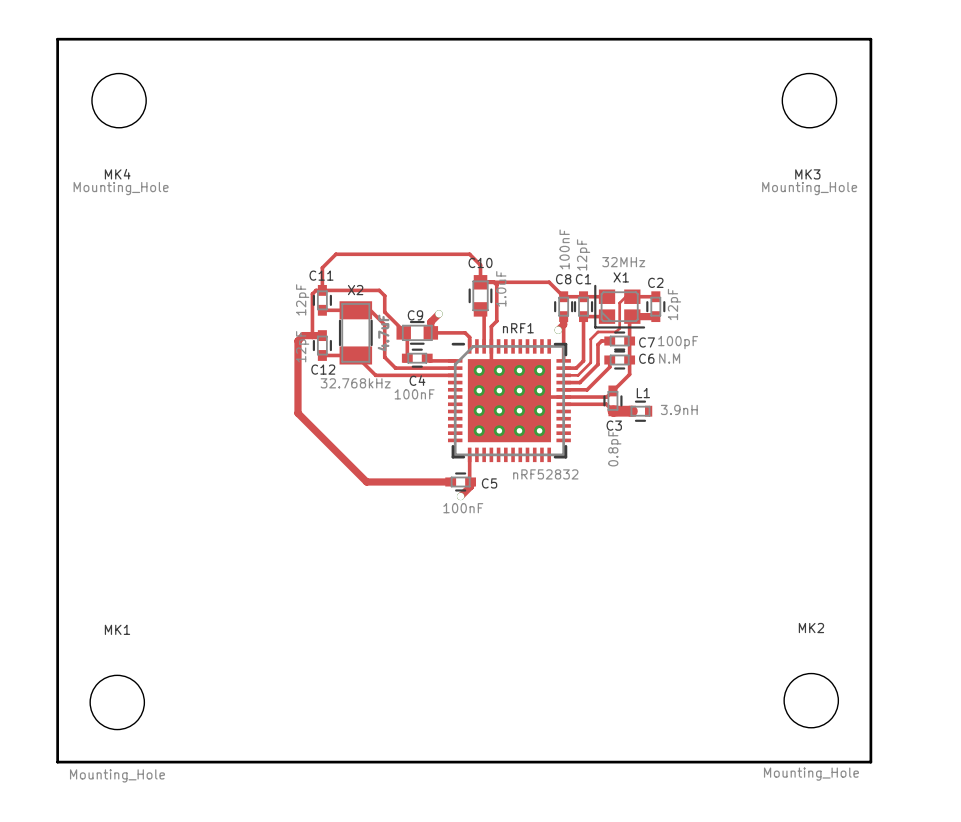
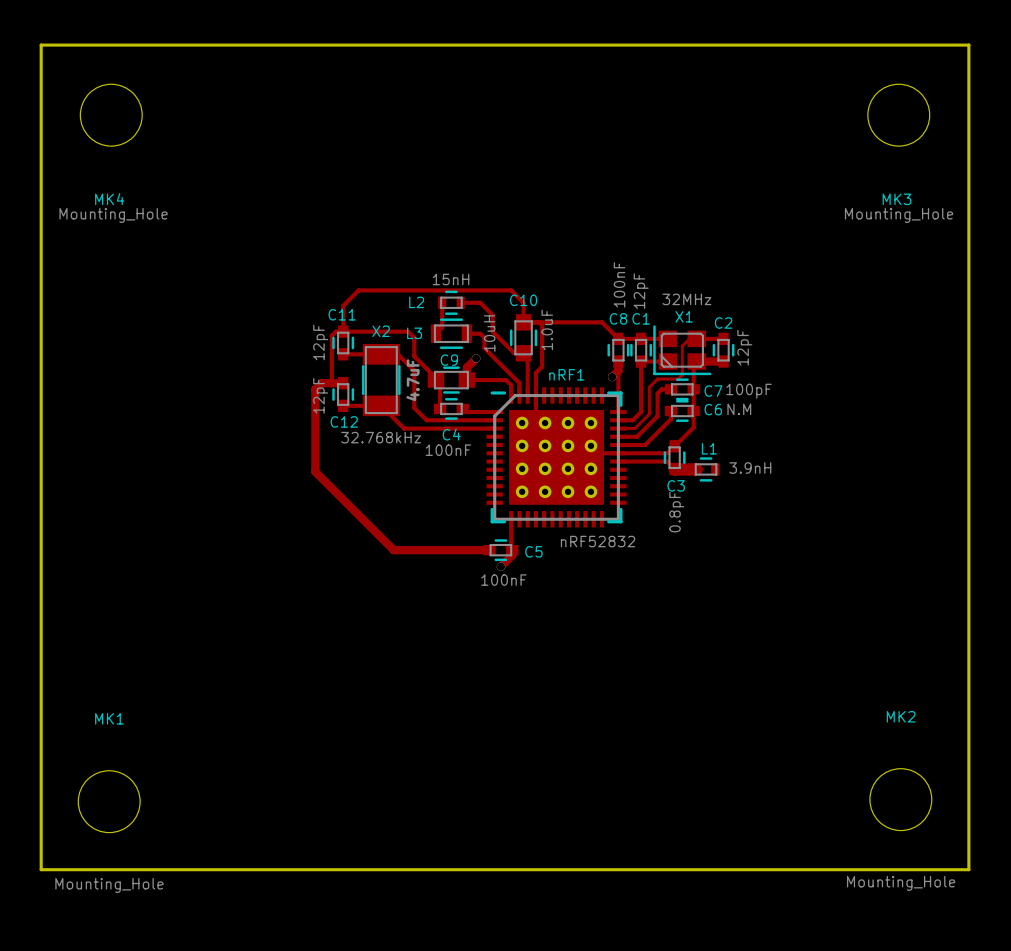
track: none -> (442, 302) (442, 327) (435, 333)
L3: none -> 15nH (451, 302)
track: none -> (460, 302) (480, 302) (492, 315) (492, 331) (514, 353) (523, 353)
L2: none -> 10uH (451, 333)
track: none -> (466, 334) (480, 333) (484, 337) (484, 348) (519, 383) (519, 395)

